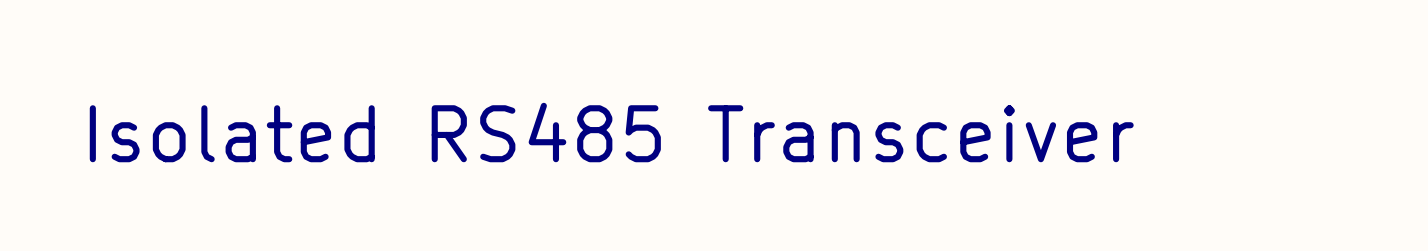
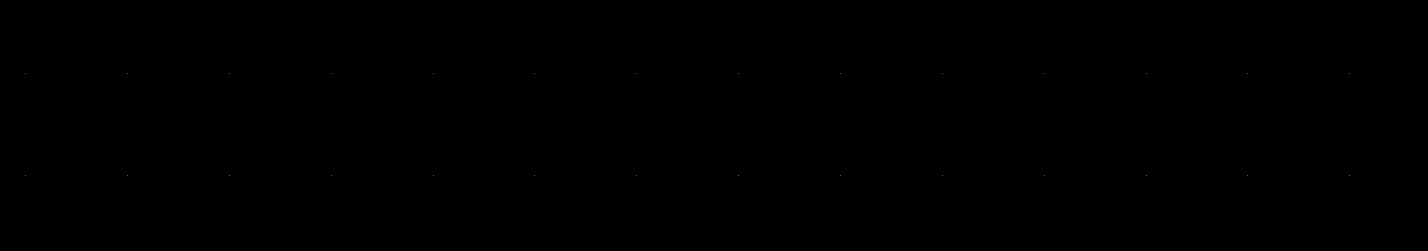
text: Isolated RS485 Transceiver (611, 132) -> none

